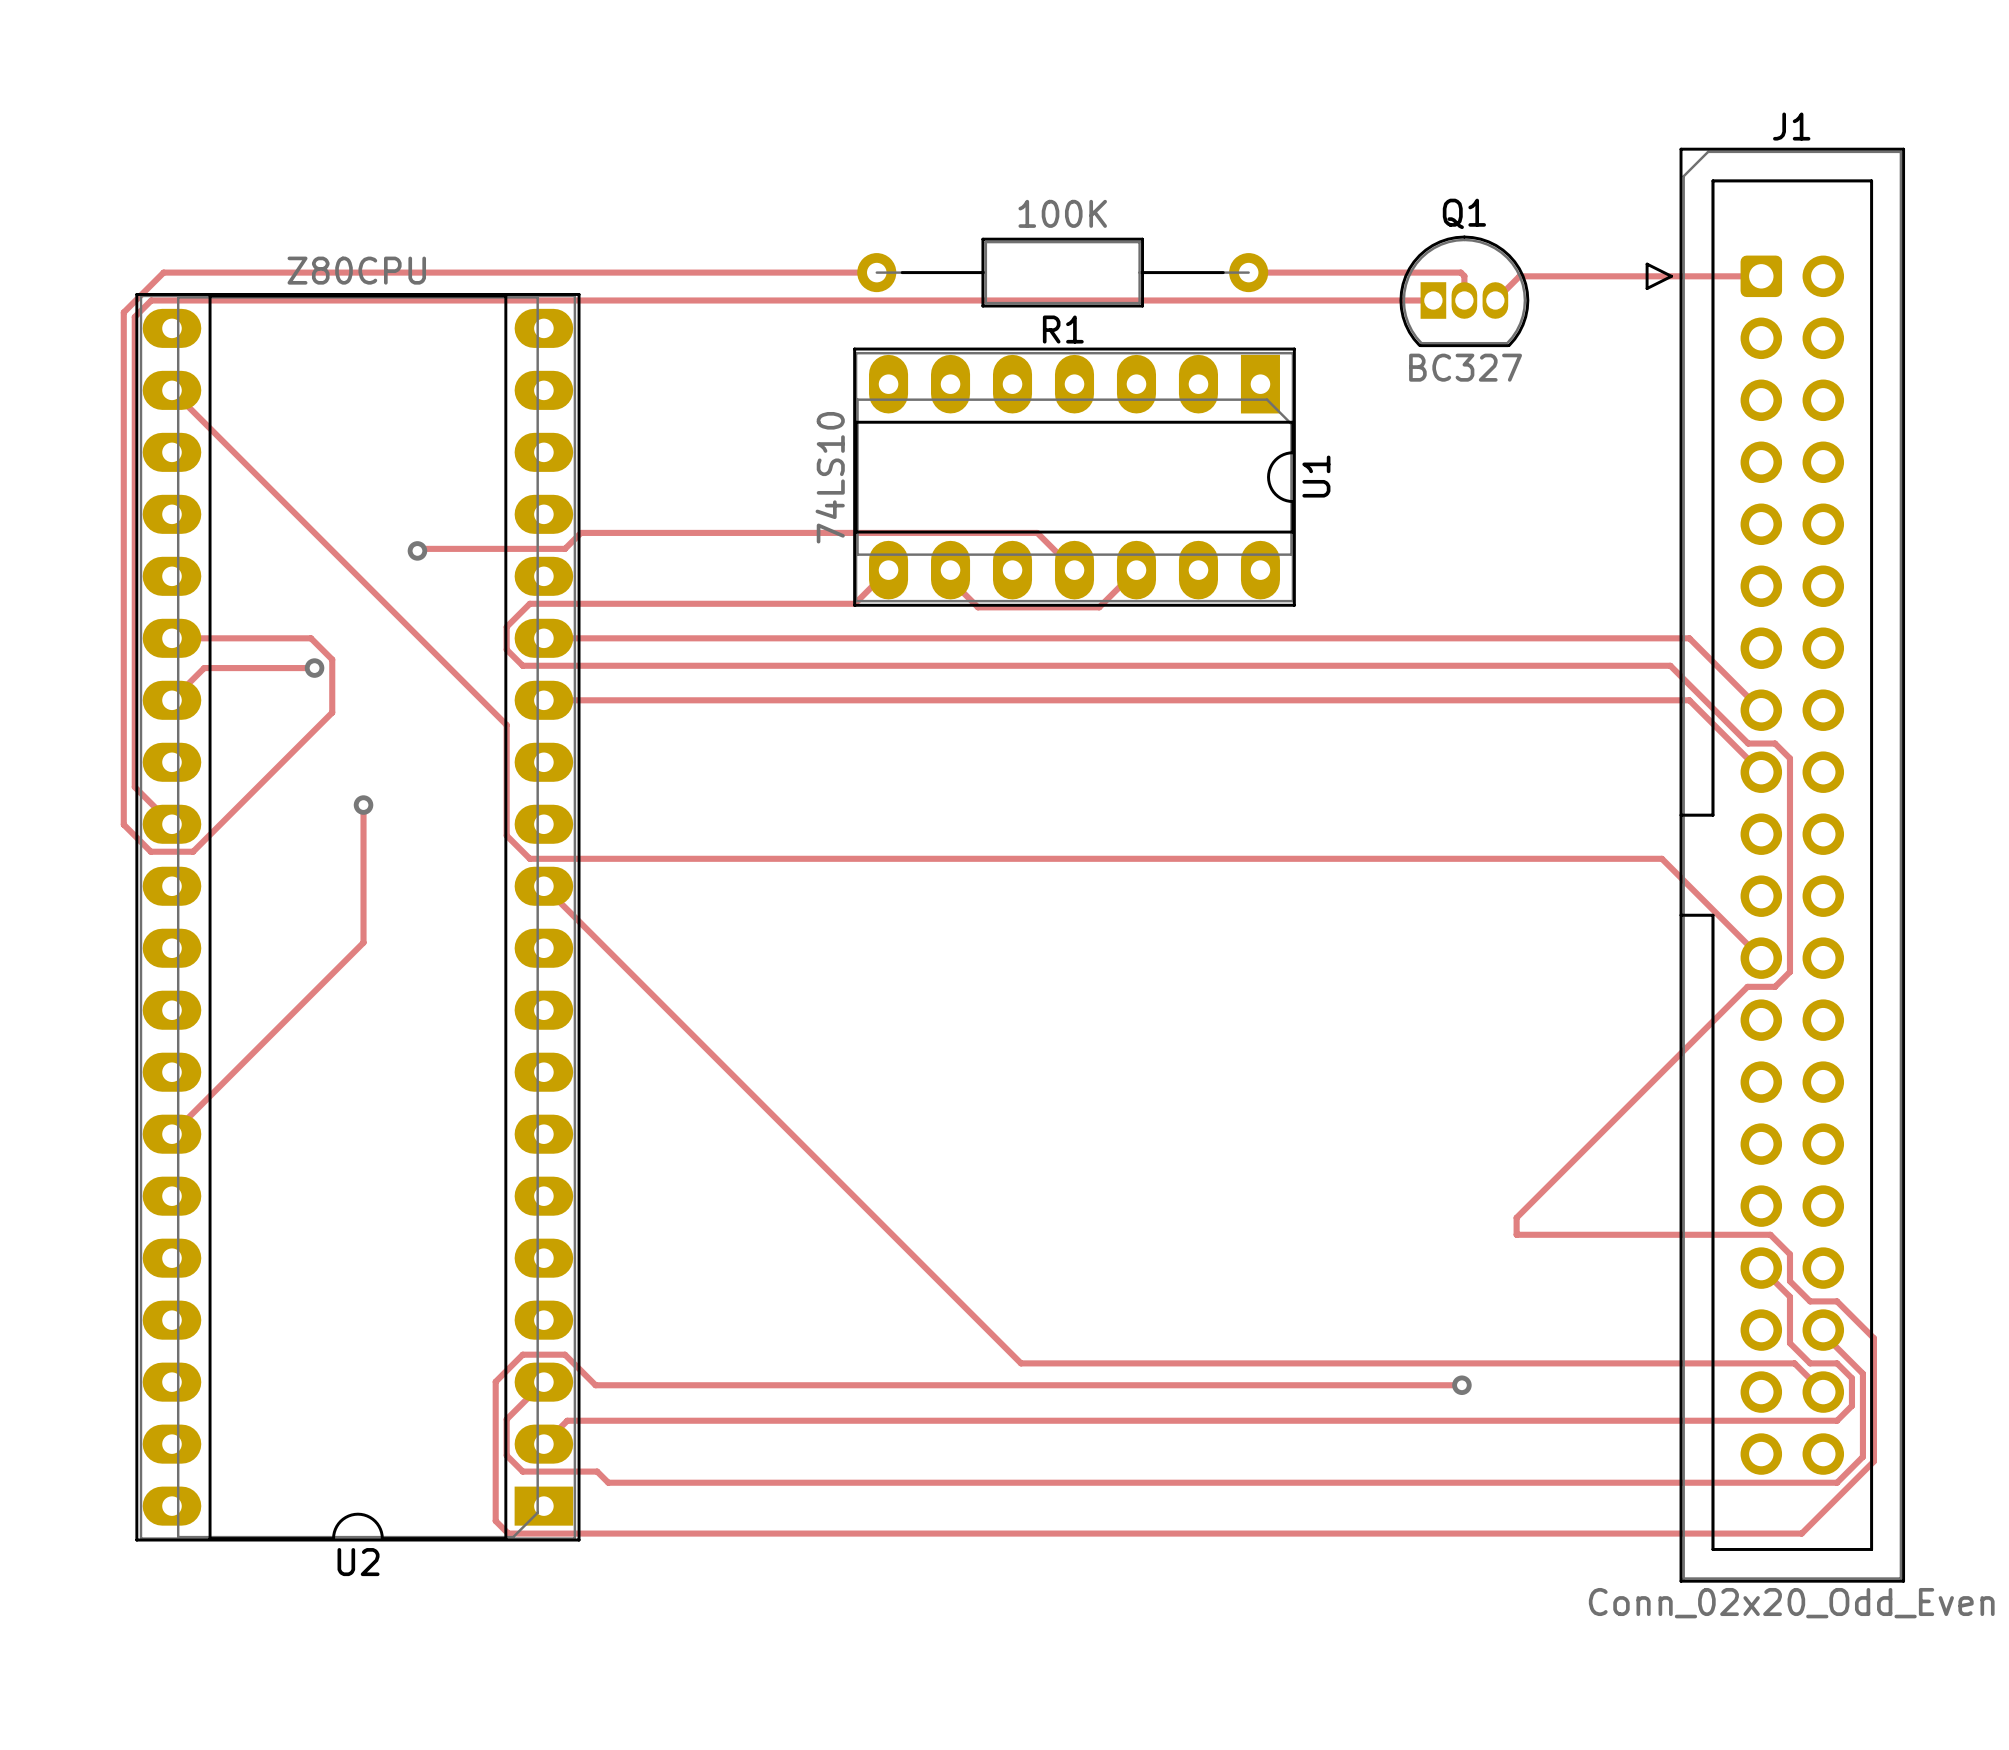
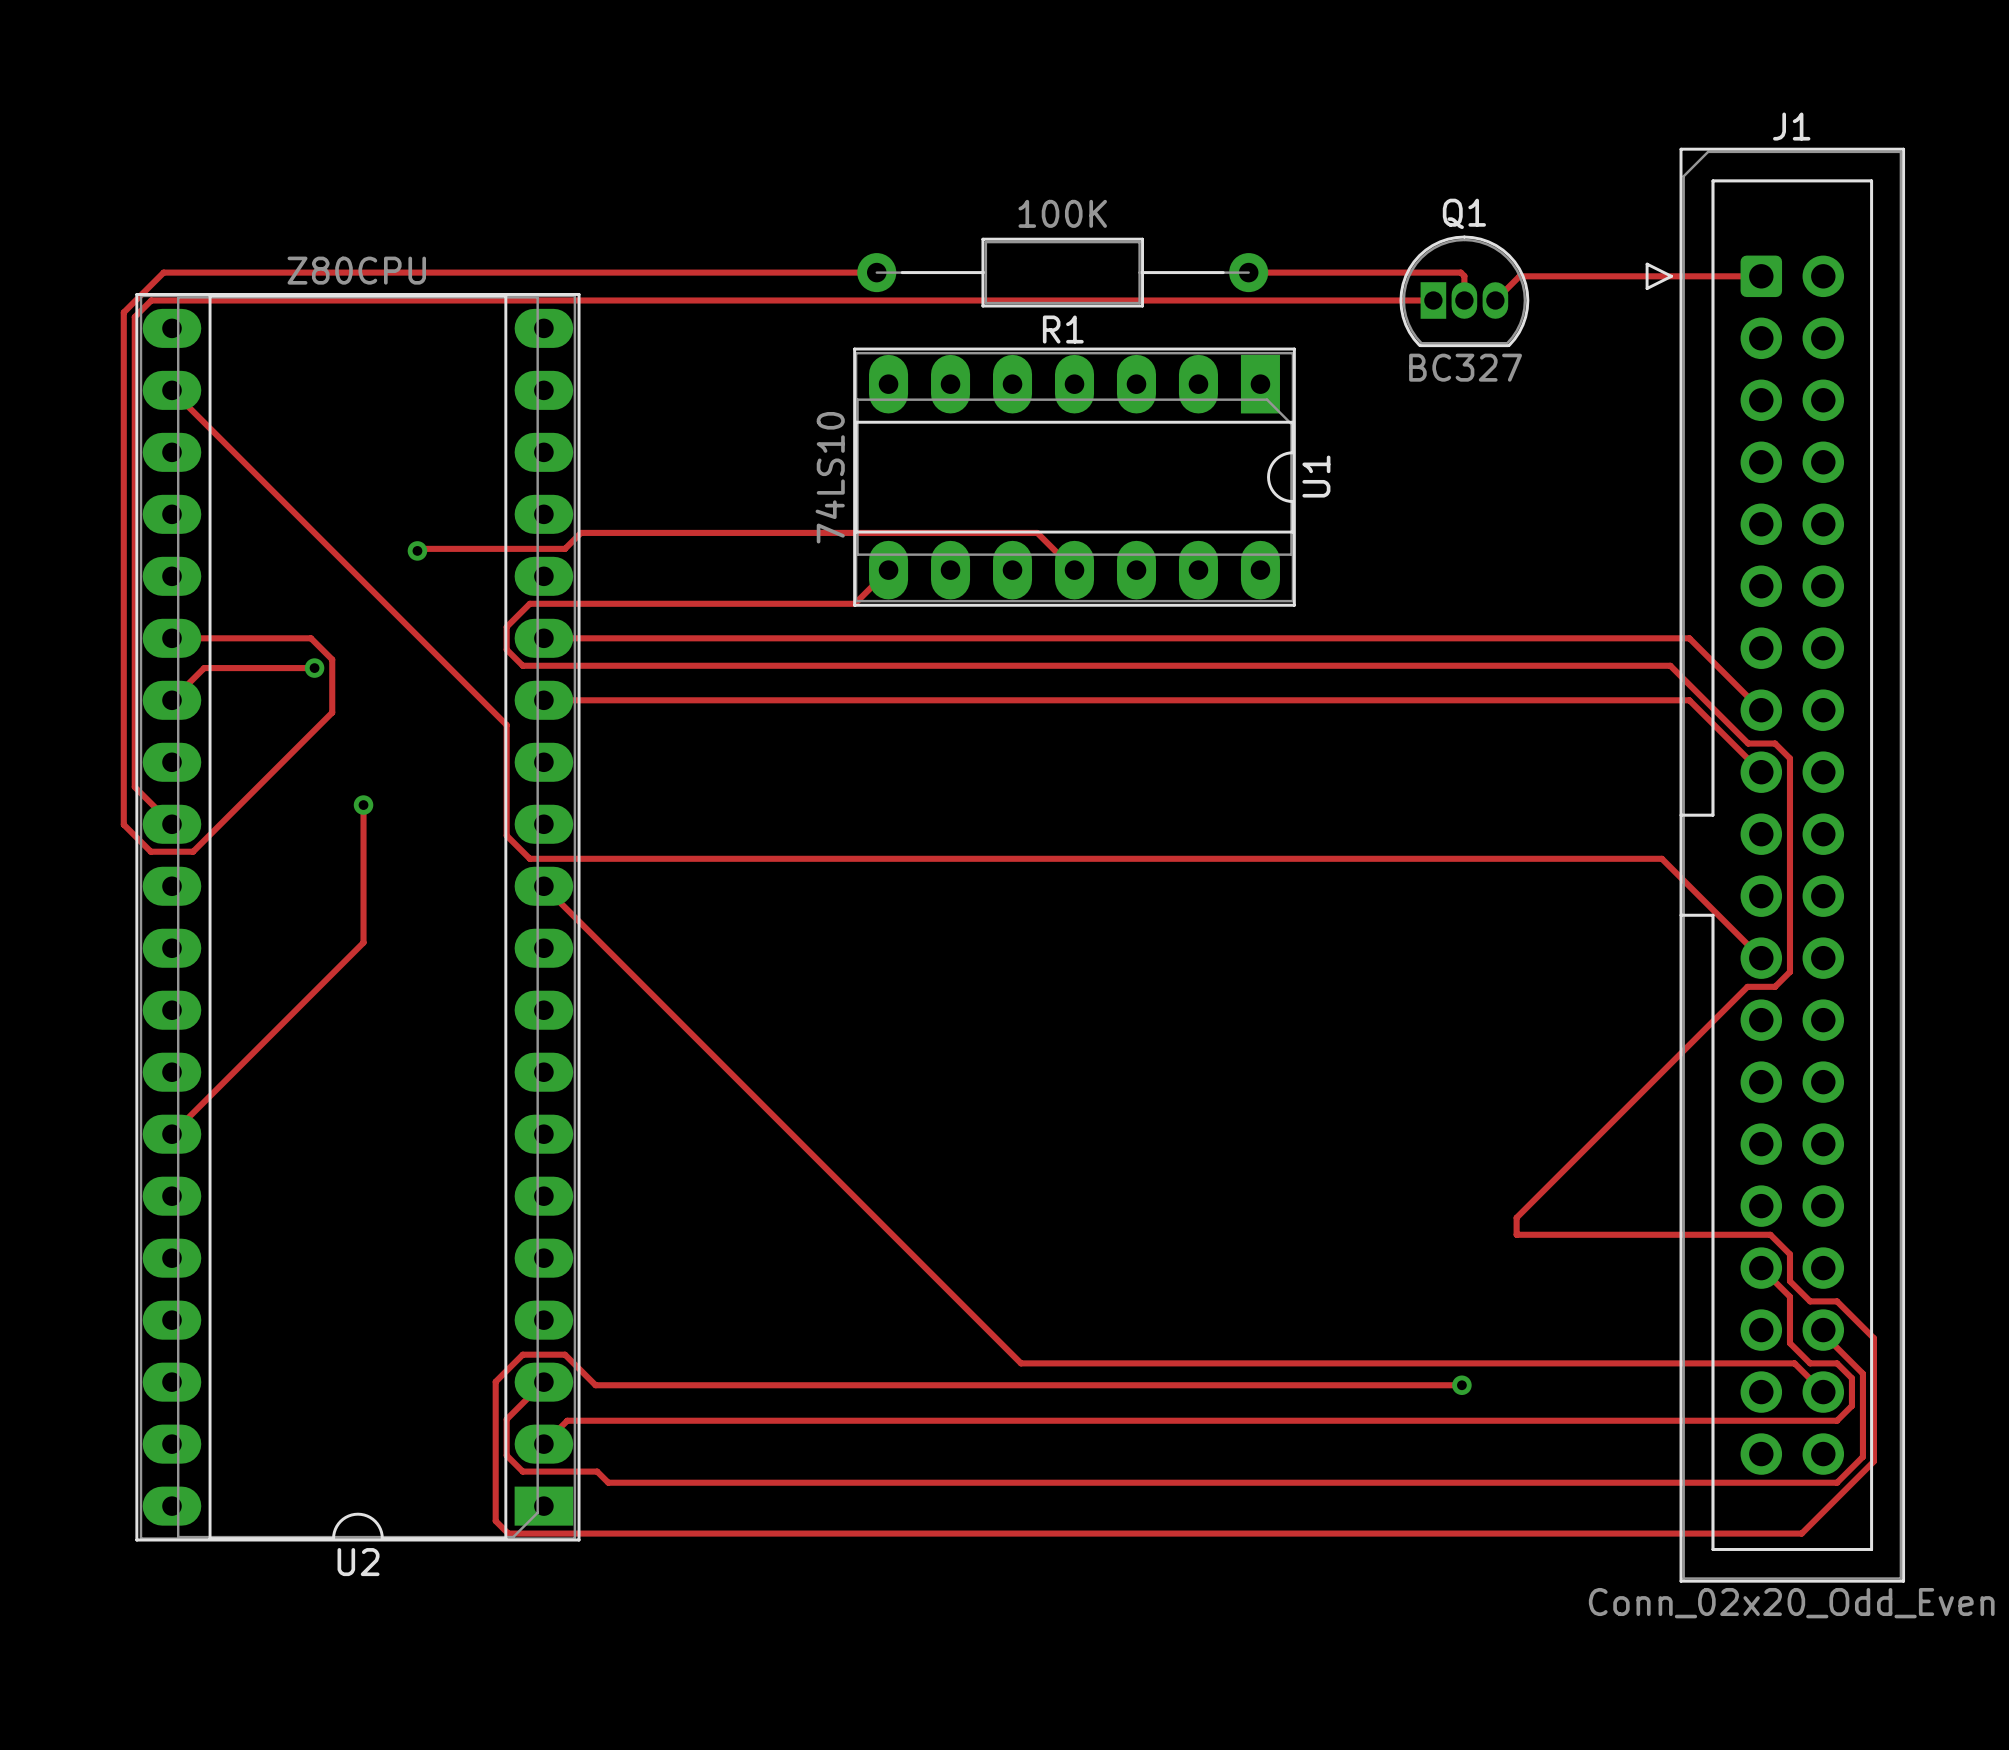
track: (950, 570) (950, 579) (977, 607) (1099, 607) (1136, 570) -> none

